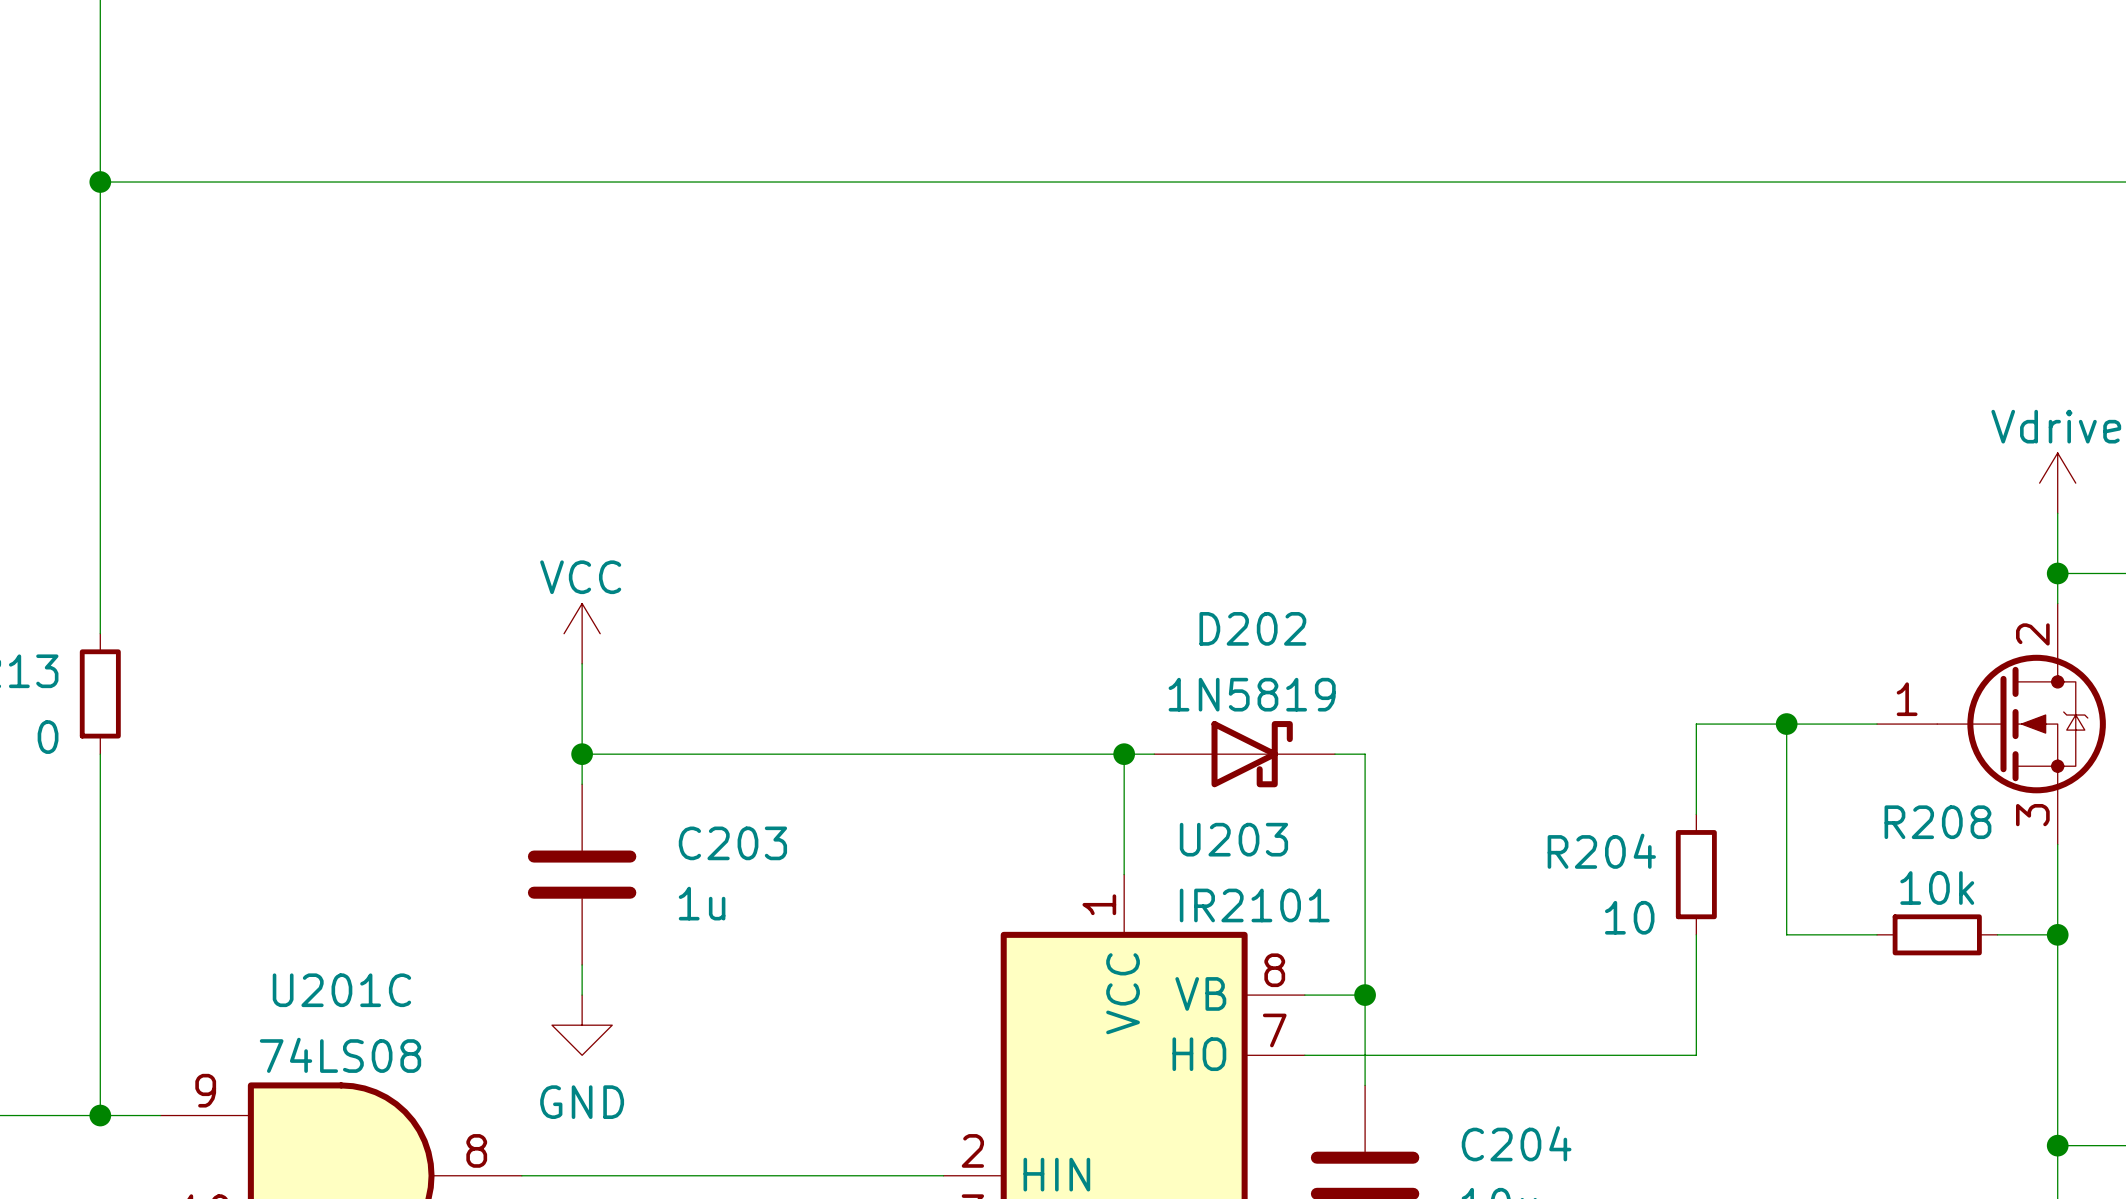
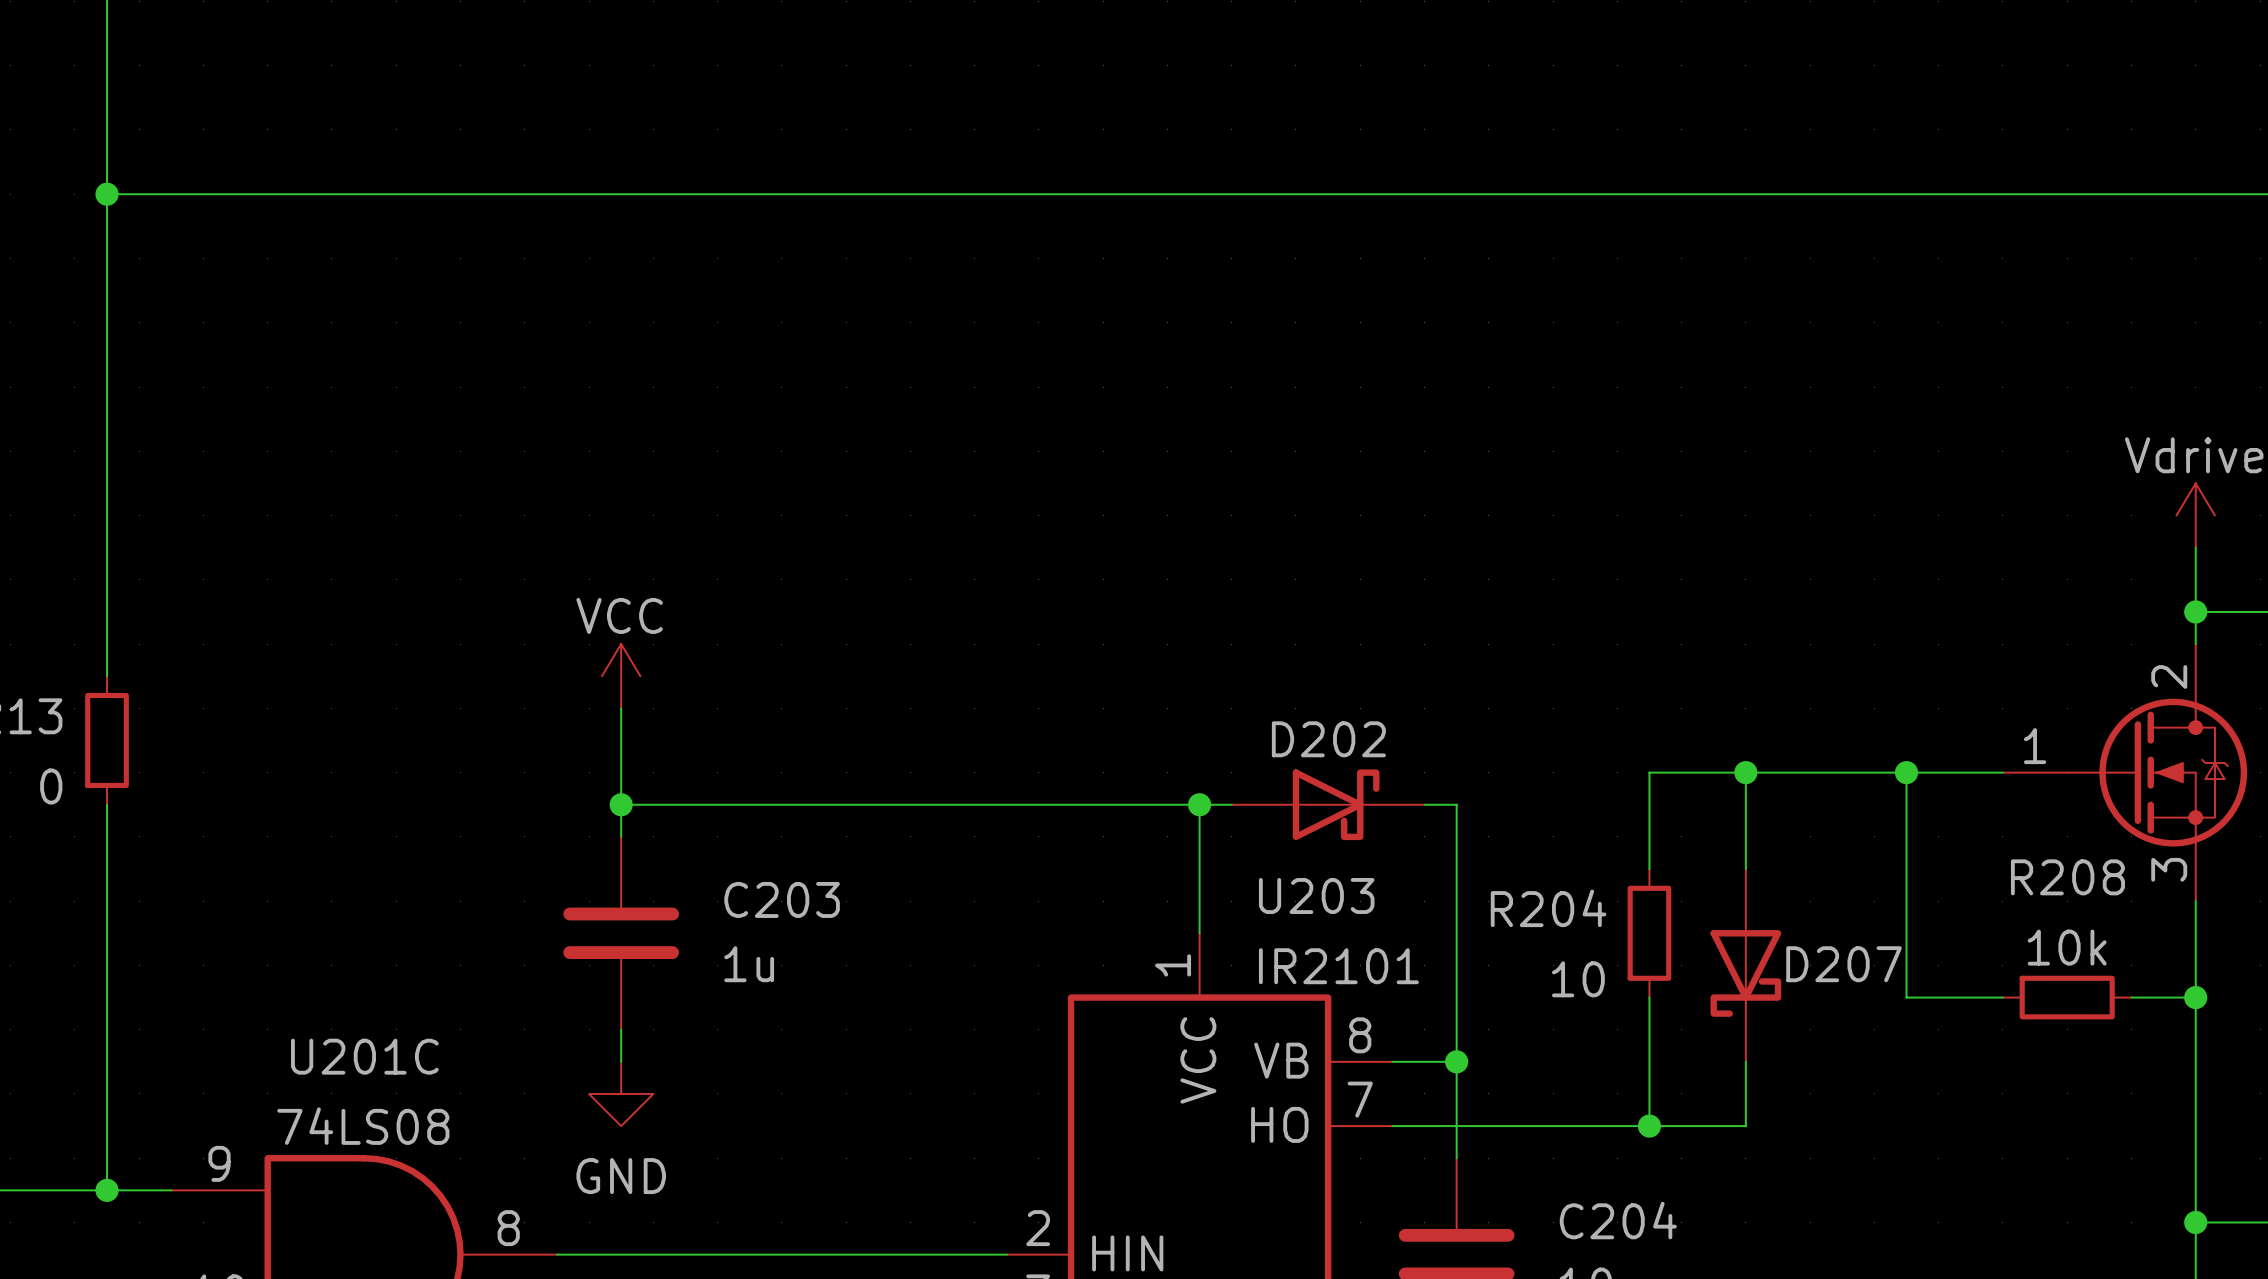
D202 name position: D202 (1252, 628) -> D202 (1328, 739)
D202 value: 1N5819 (1252, 694) -> none
wire: none -> (1745, 772) (1745, 869)
junction: none -> (1745, 772)
wire: (1696, 724) (1696, 814) -> (1810, 772) (1649, 772) (1649, 869)
R204 position: (1696, 874) -> (1649, 933)
D207: none -> (1745, 965)
wire: none -> (1649, 997) (1649, 1126)
wire: (1696, 934) (1696, 1055) (1636, 1055) -> (1745, 1061) (1745, 1126)
junction: none -> (1649, 1126)

